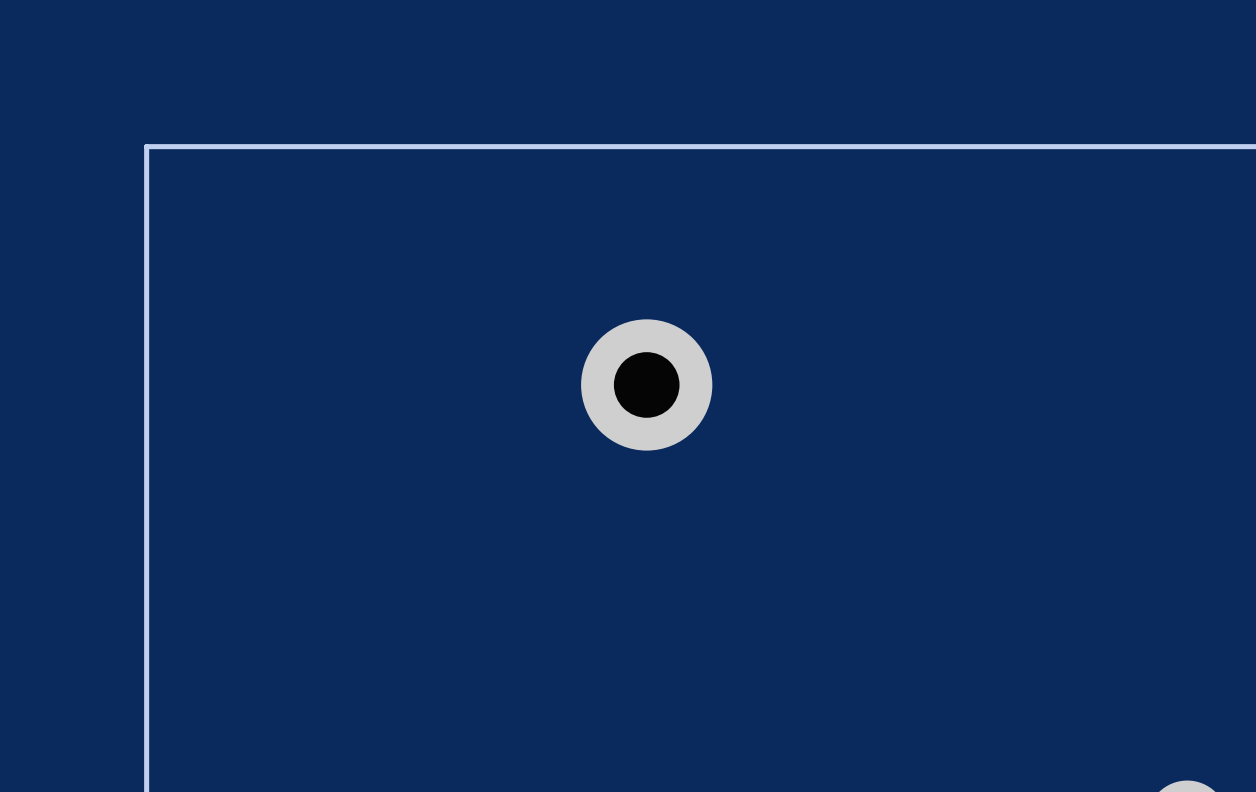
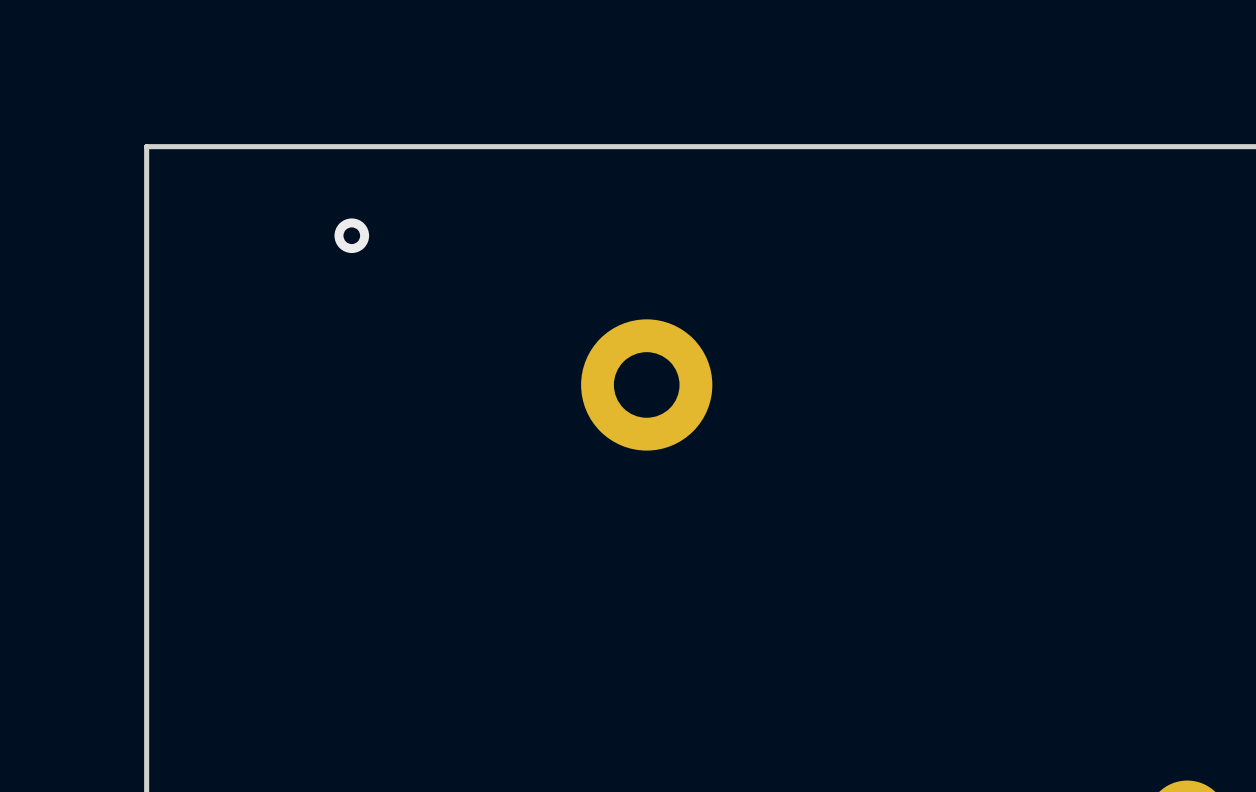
via: none -> (351, 235)

